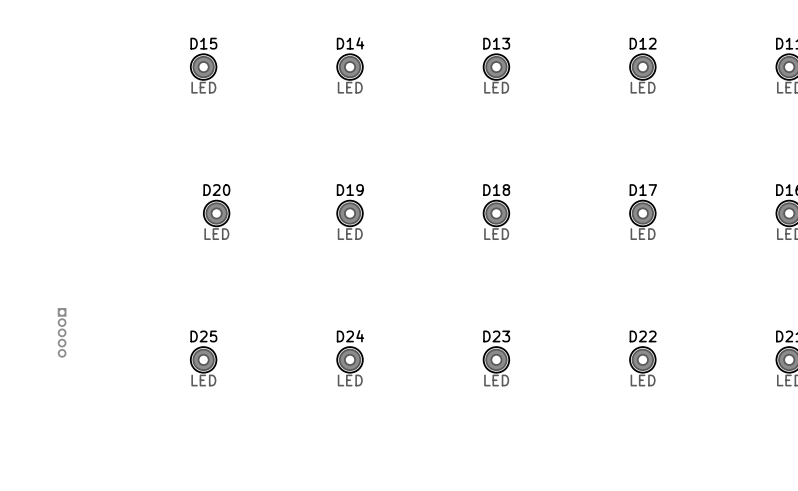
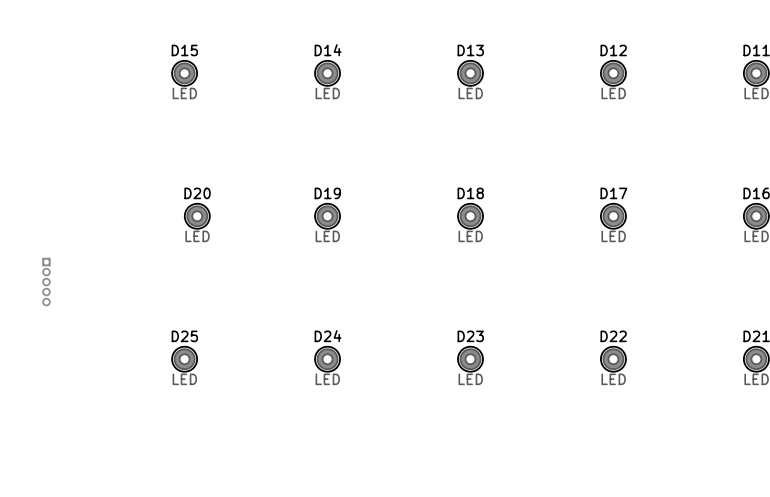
part position: (62, 332) -> (46, 282)

